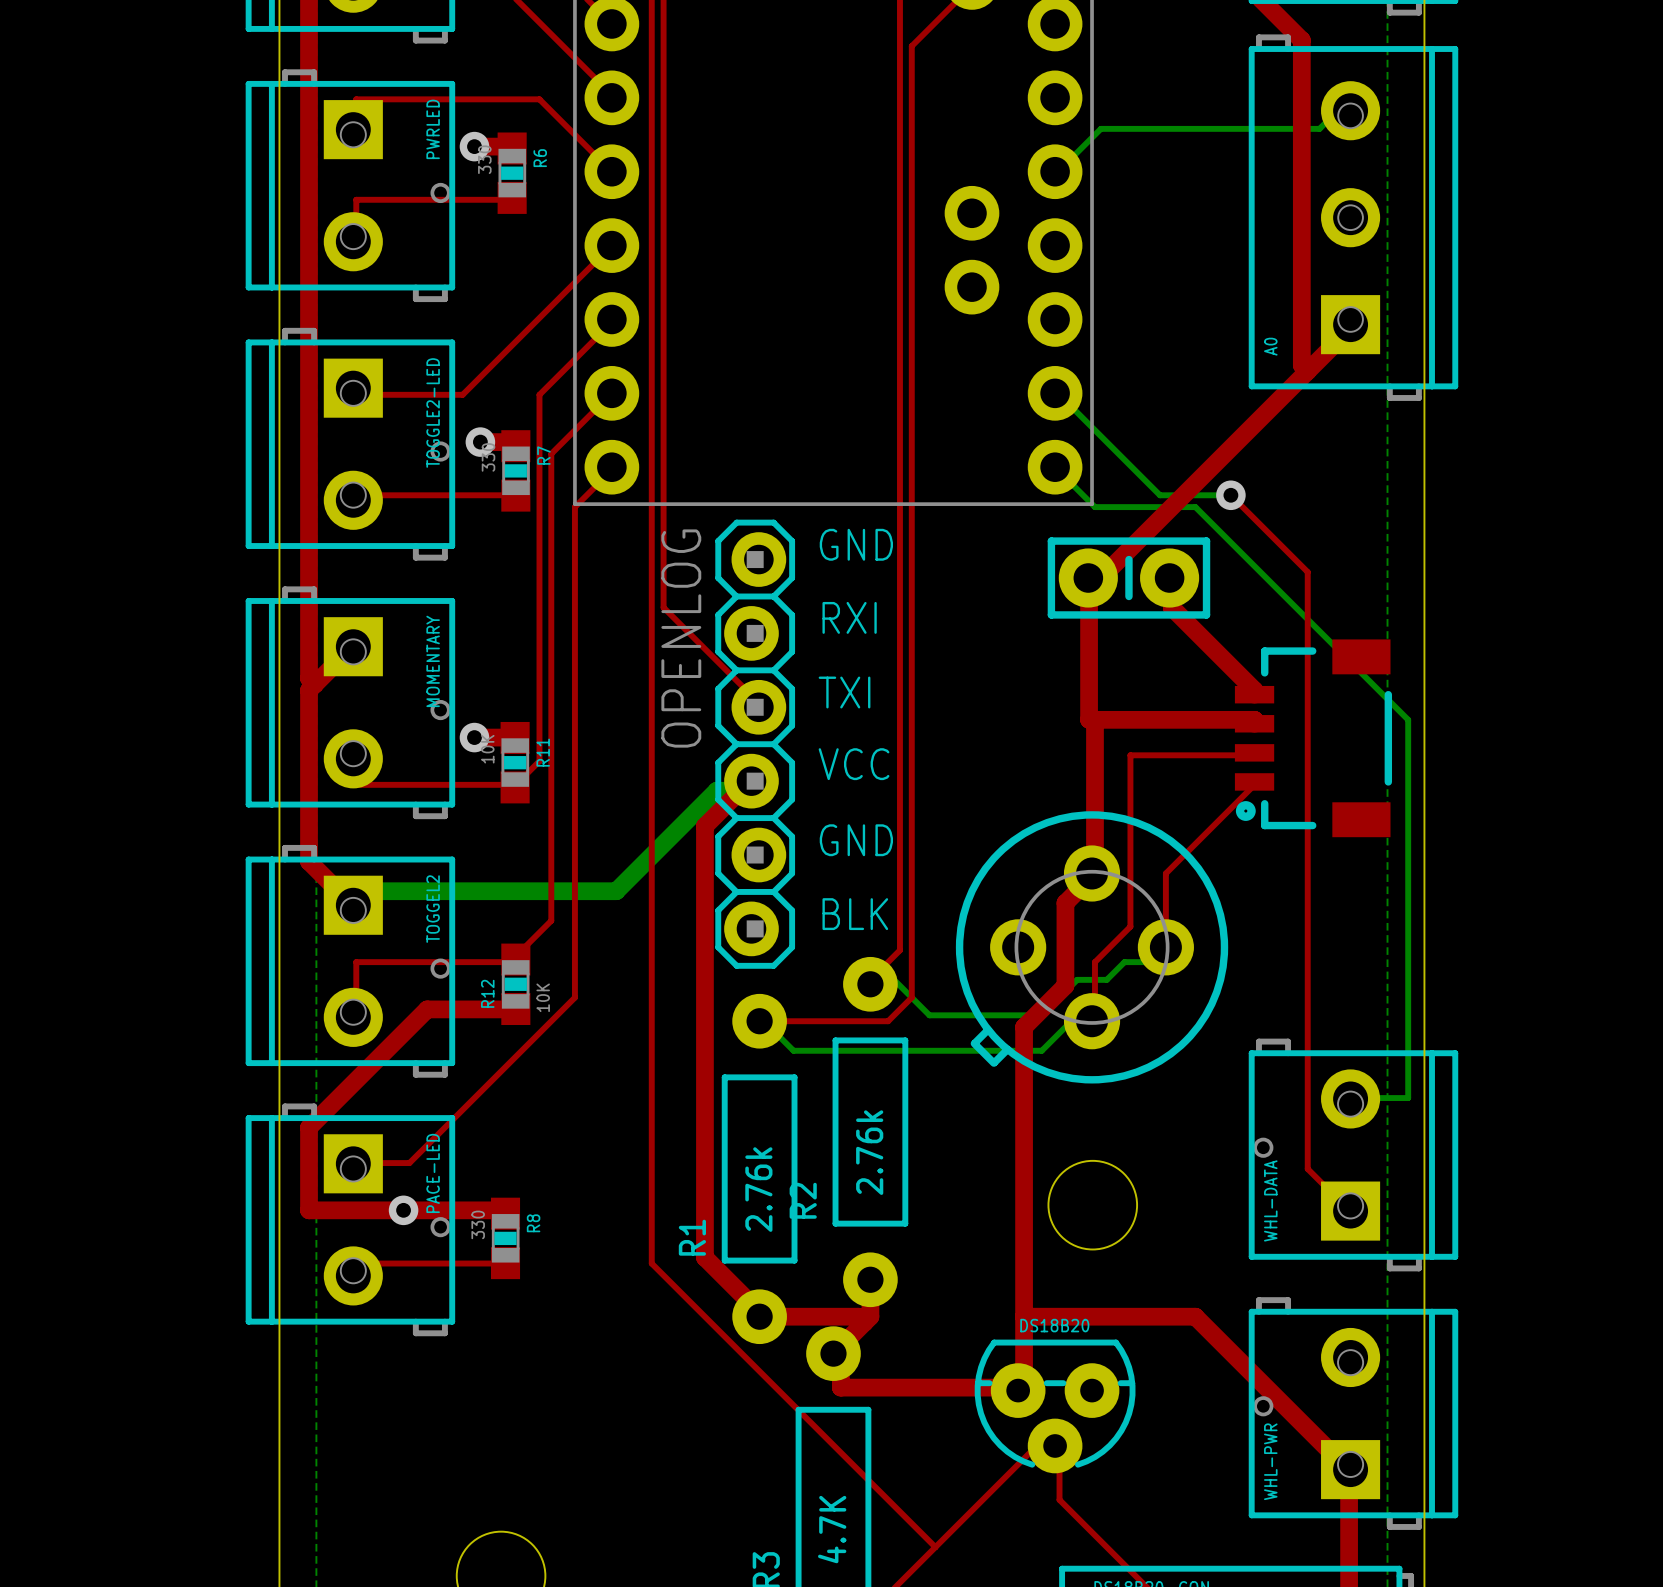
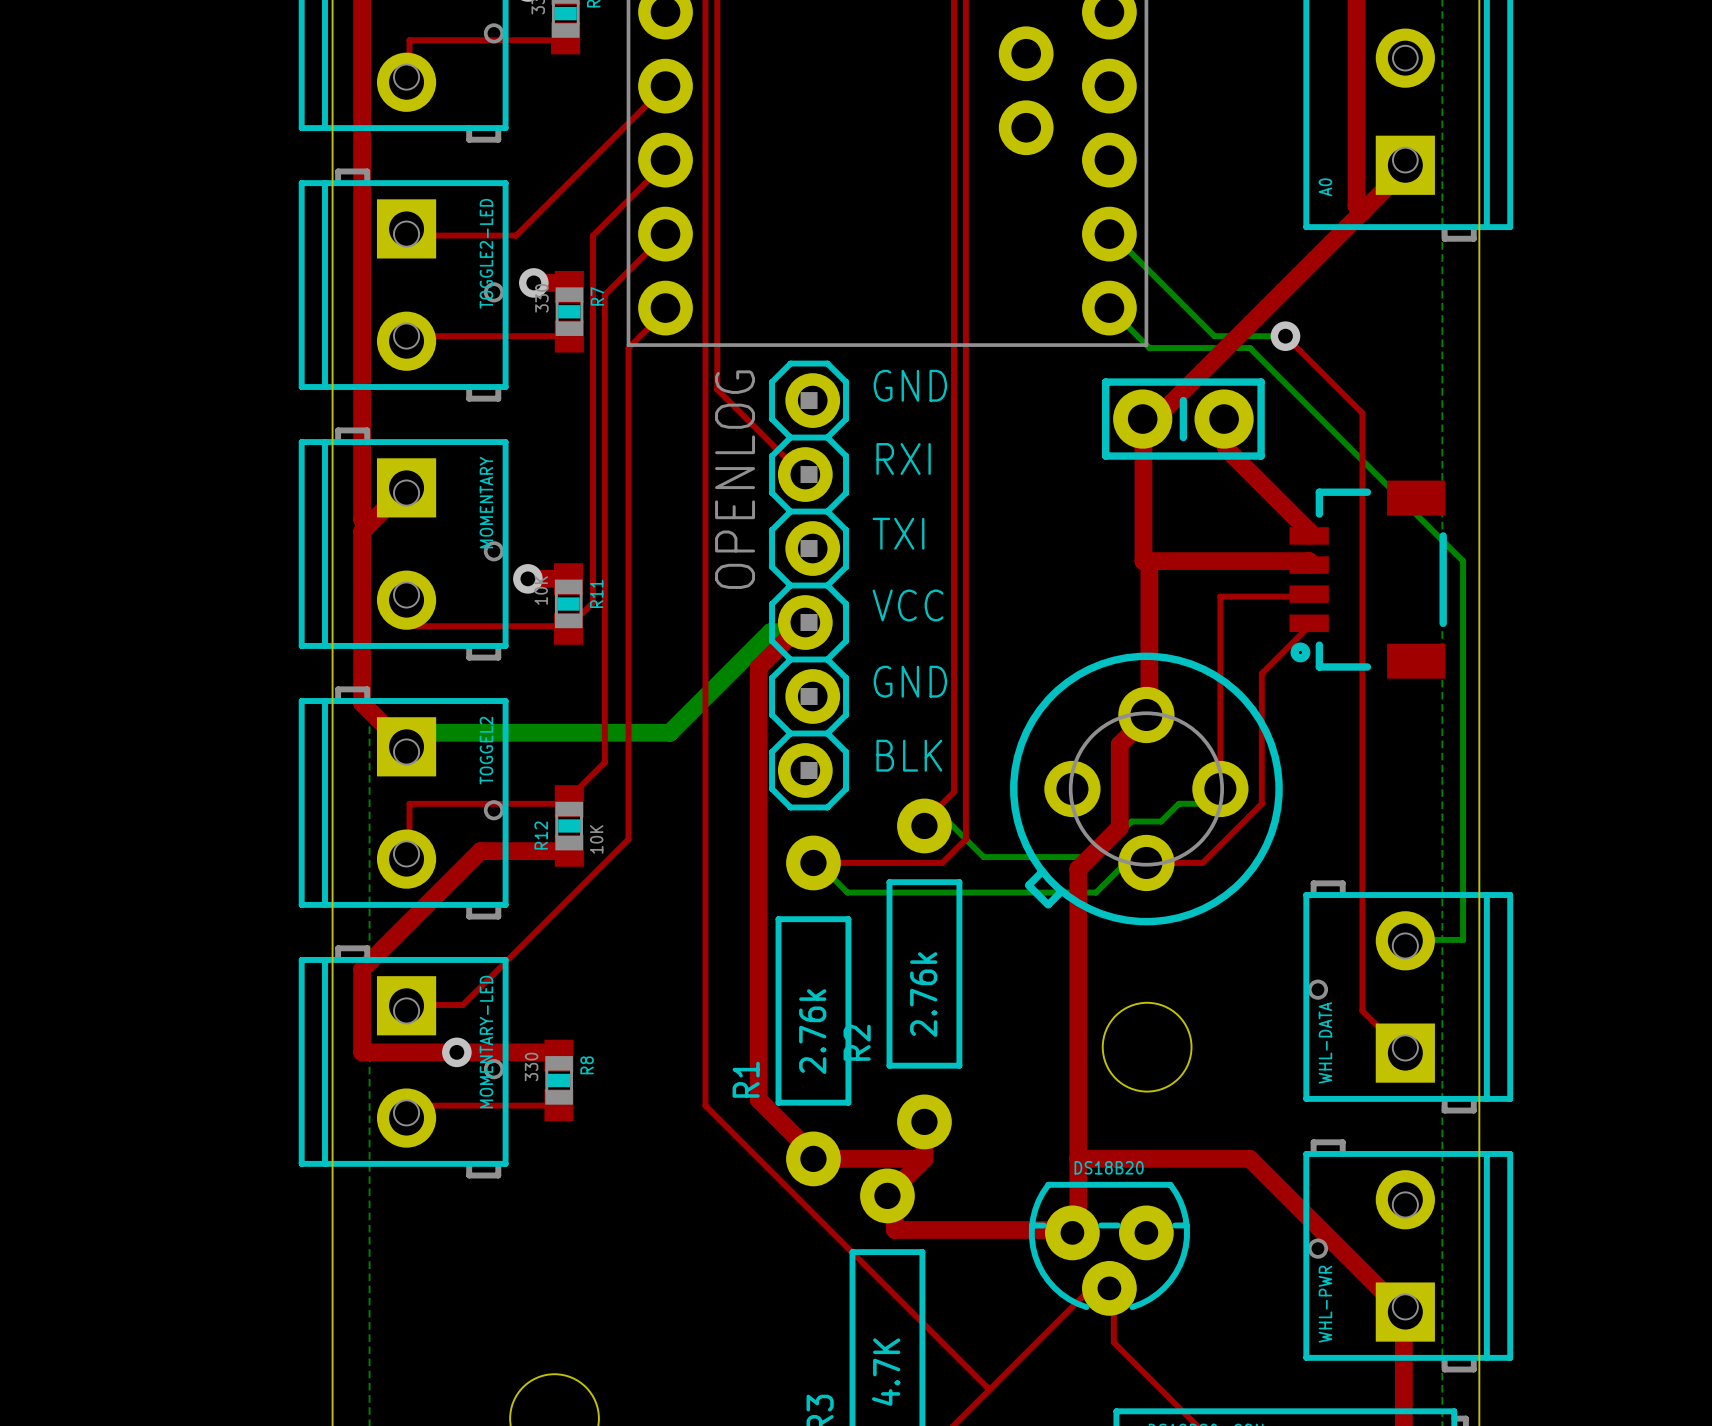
top track: (663, 548) (663, 607) (758, 702) (758, 707) -> (717, 389) (800, 472) (805, 474)
top track: (1165, 755) (1130, 755) (1130, 926) (1094, 962) (1094, 1021) -> (1261, 673) (1261, 803) (1202, 862) (1149, 862)
top track: (1207, 832) (1165, 873) -> (1220, 596) (1220, 714)
PACE-LED name: PACE-LED (433, 1173) -> MOMENTARY-LED (486, 1042)

